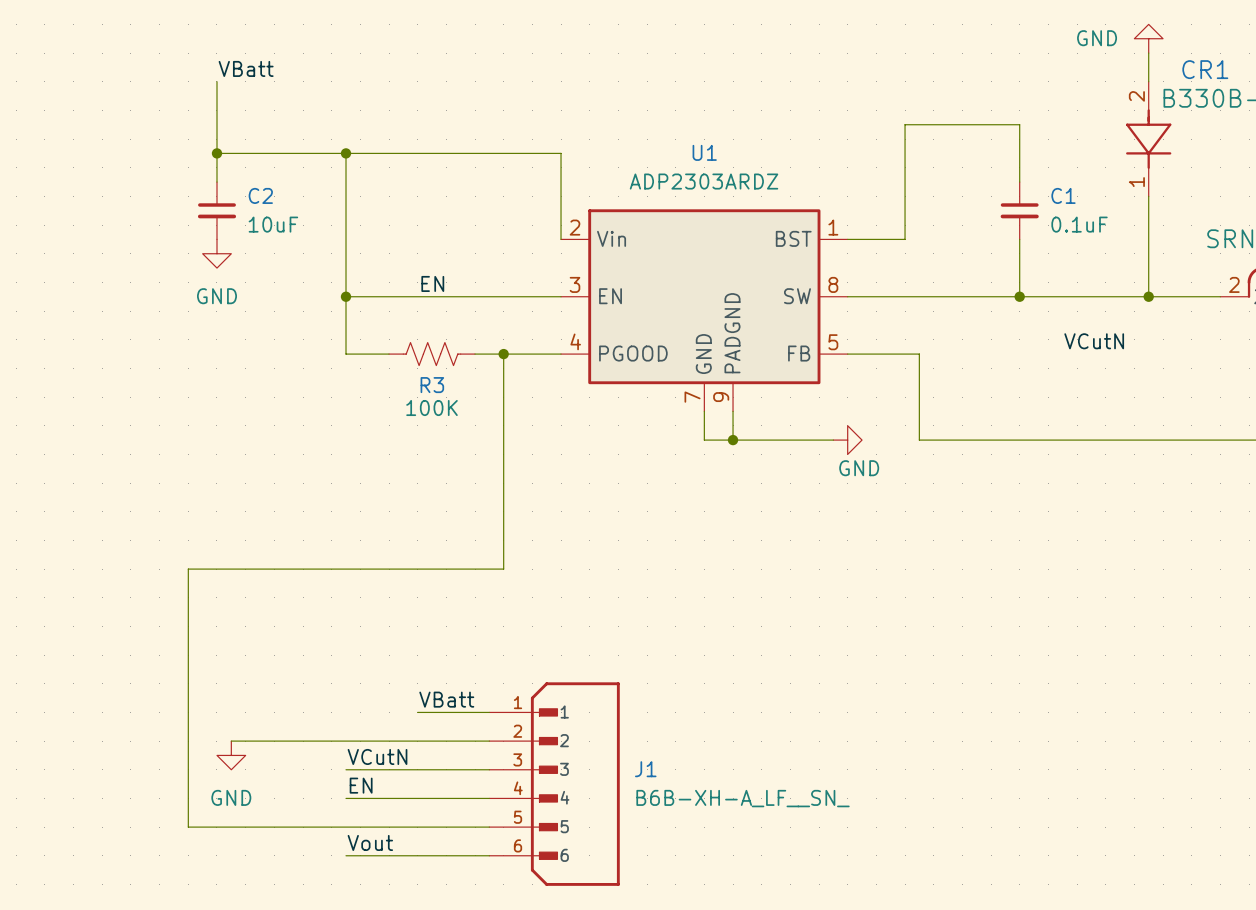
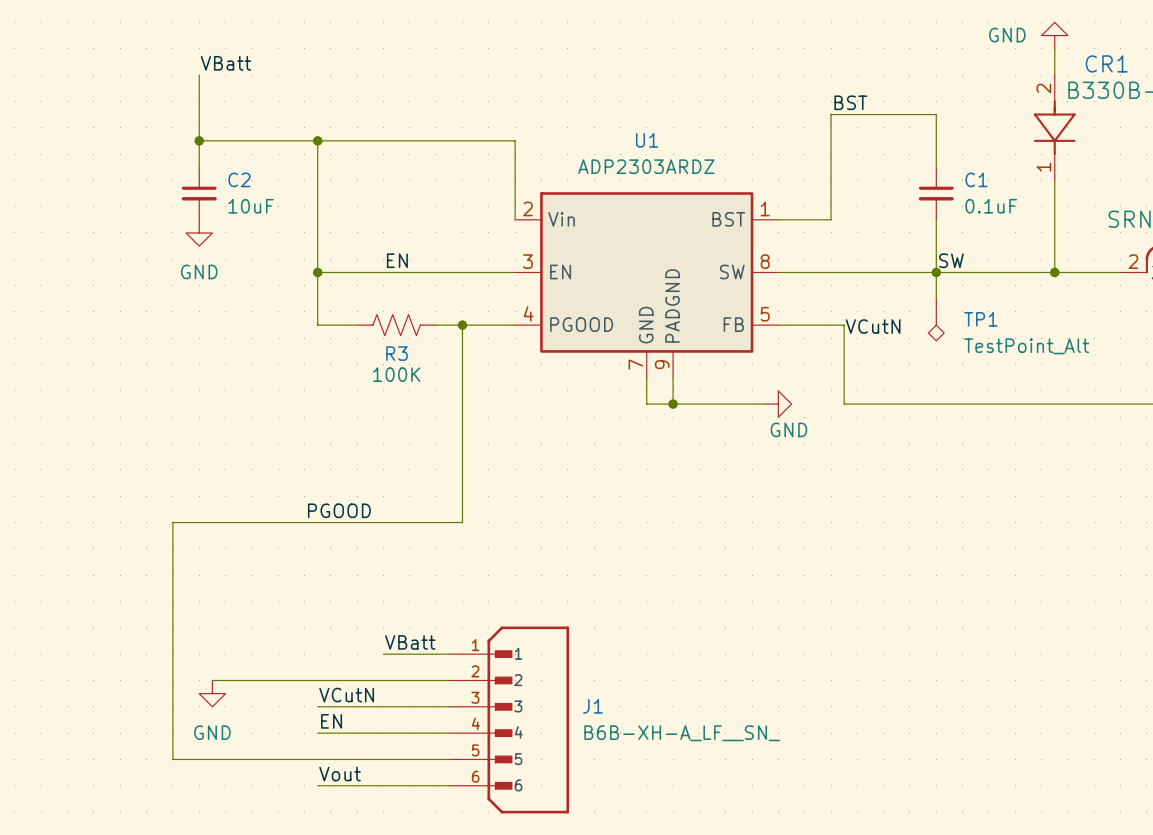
label: none -> BST (850, 102)
label: none -> SW (951, 260)
wire: none -> (936, 272) (936, 298)
label position: VCutN (1094, 341) -> VCutN (873, 326)
TP1: none -> TestPoint_Alt (936, 319)
label: none -> PGOOD (339, 510)

